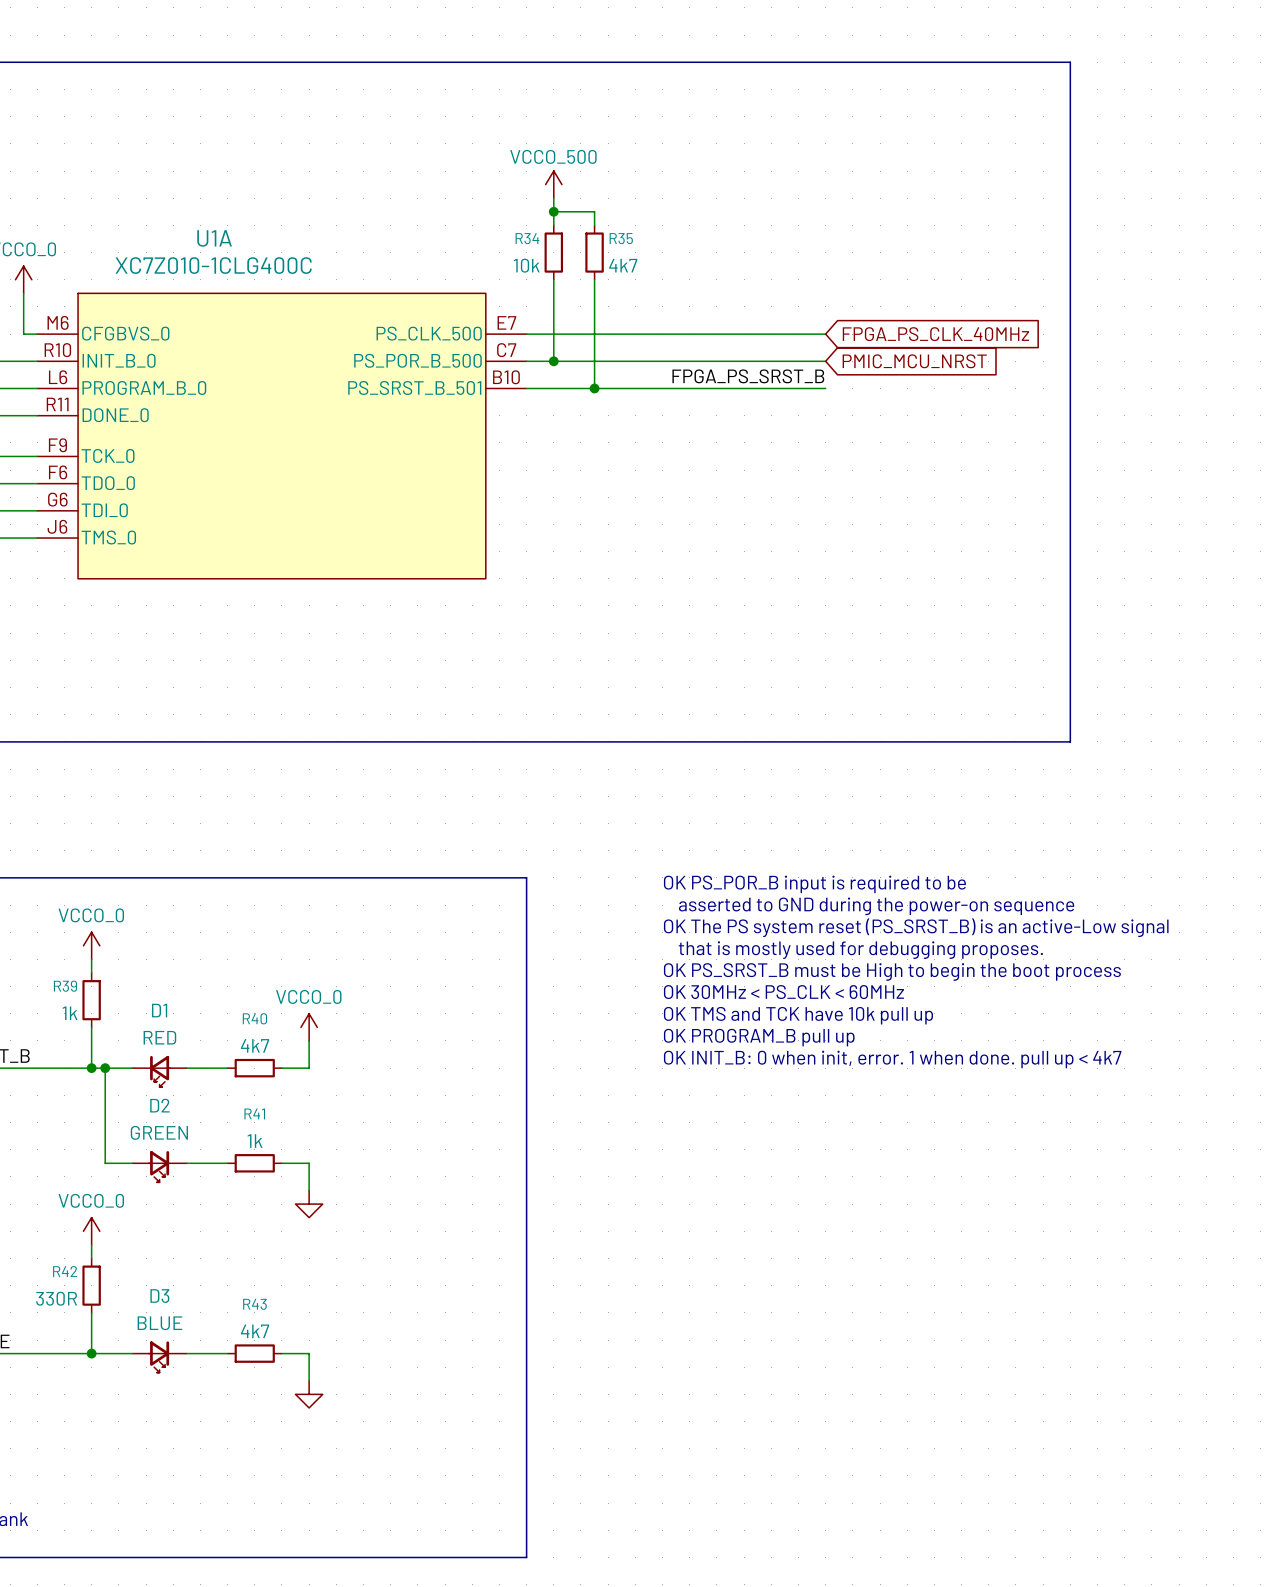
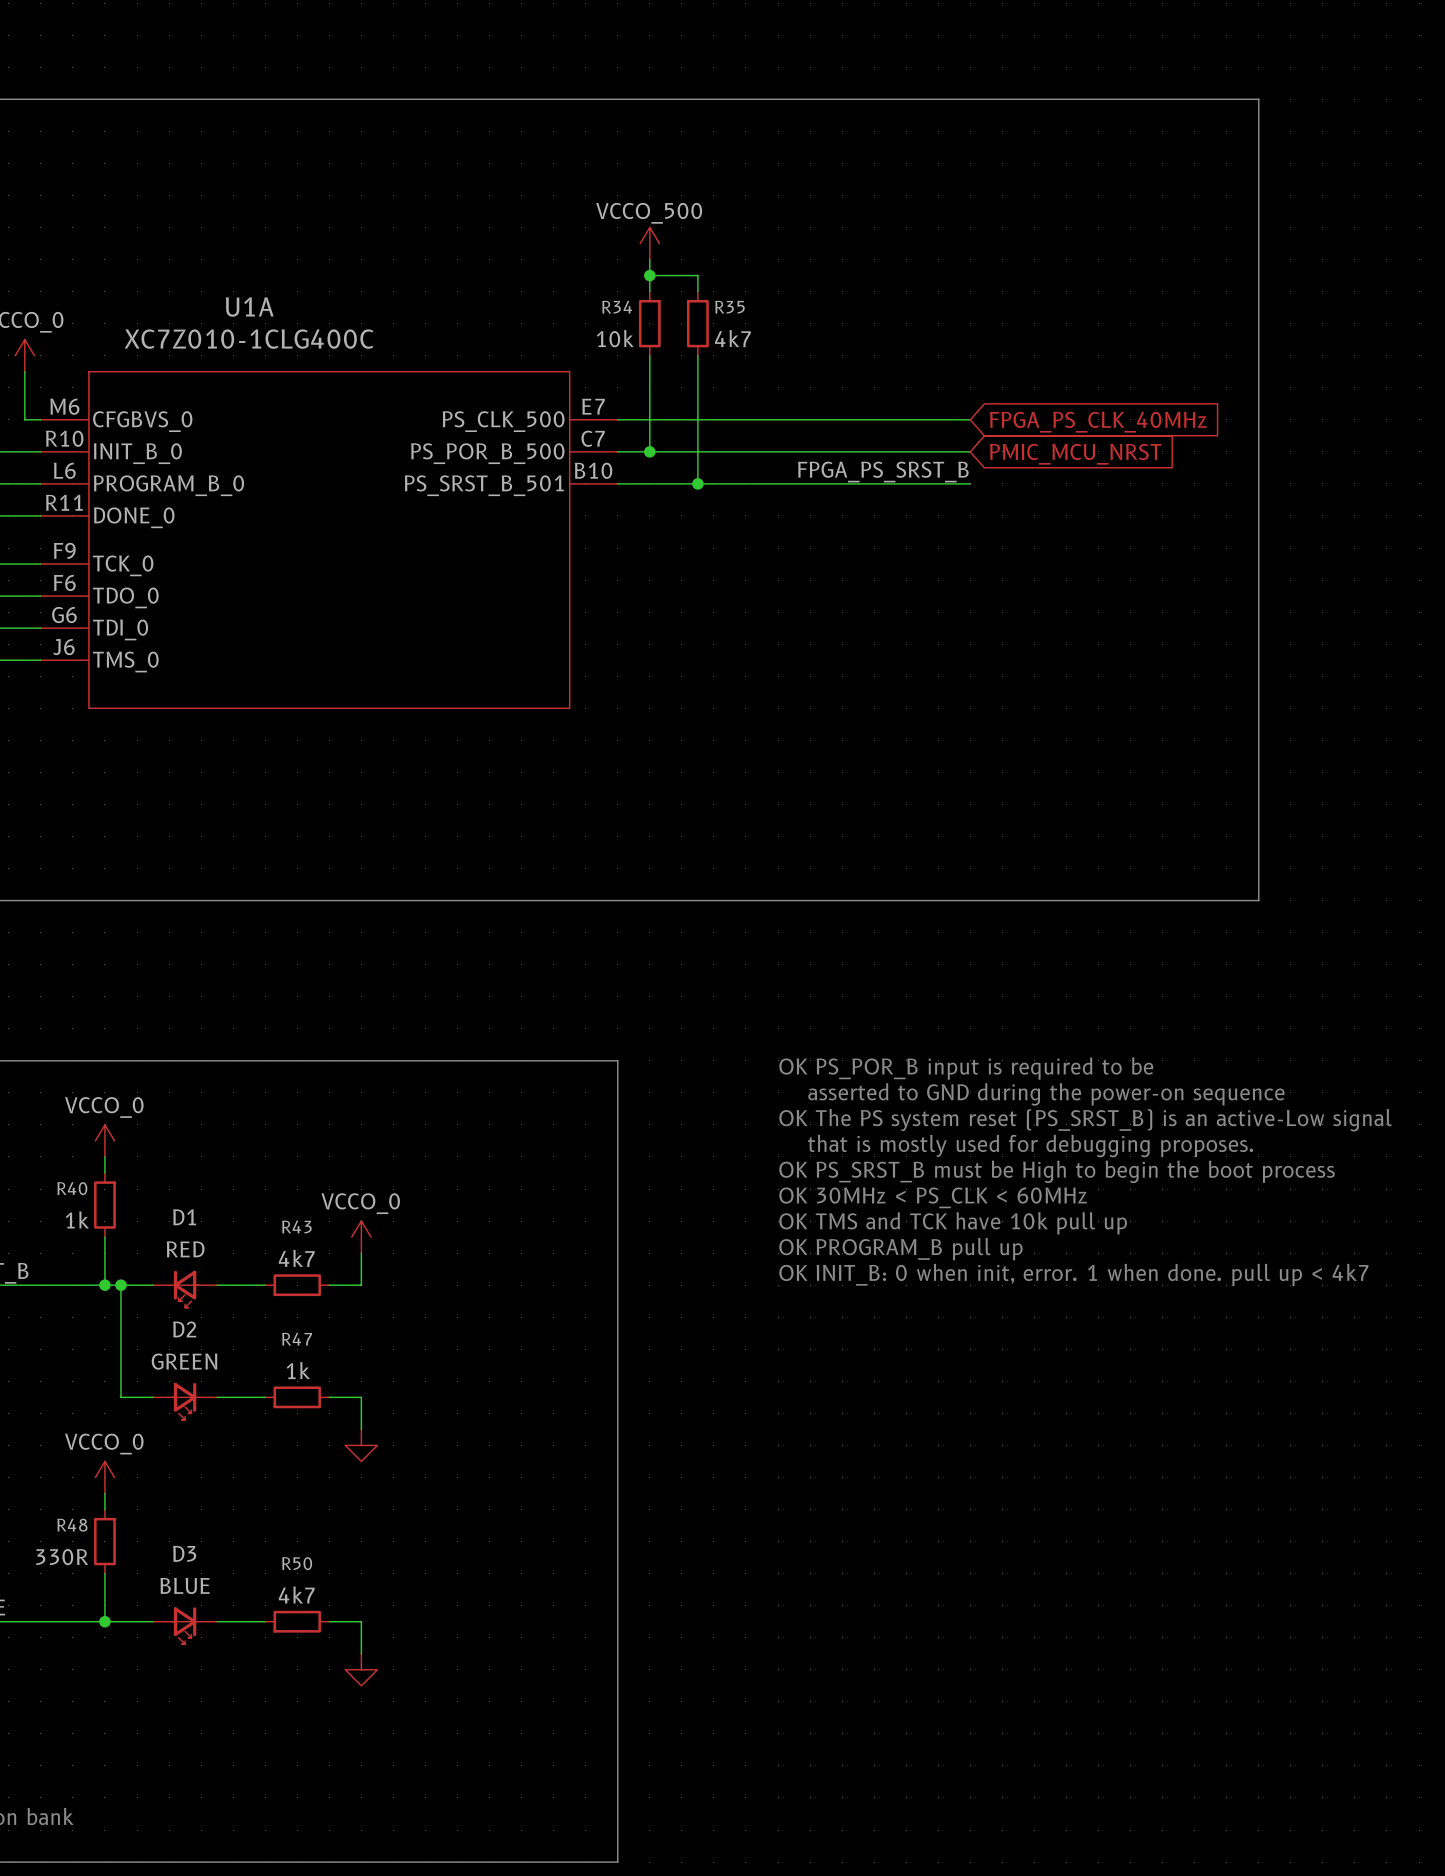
R39 name: R39 (65, 986) -> R40 (72, 1188)
R40 name: R40 (254, 1018) -> R43 (296, 1227)
R41 name: R41 (254, 1113) -> R47 (297, 1339)
R42 name: R42 (65, 1271) -> R48 (72, 1525)
R43 name: R43 (254, 1304) -> R50 (297, 1563)

